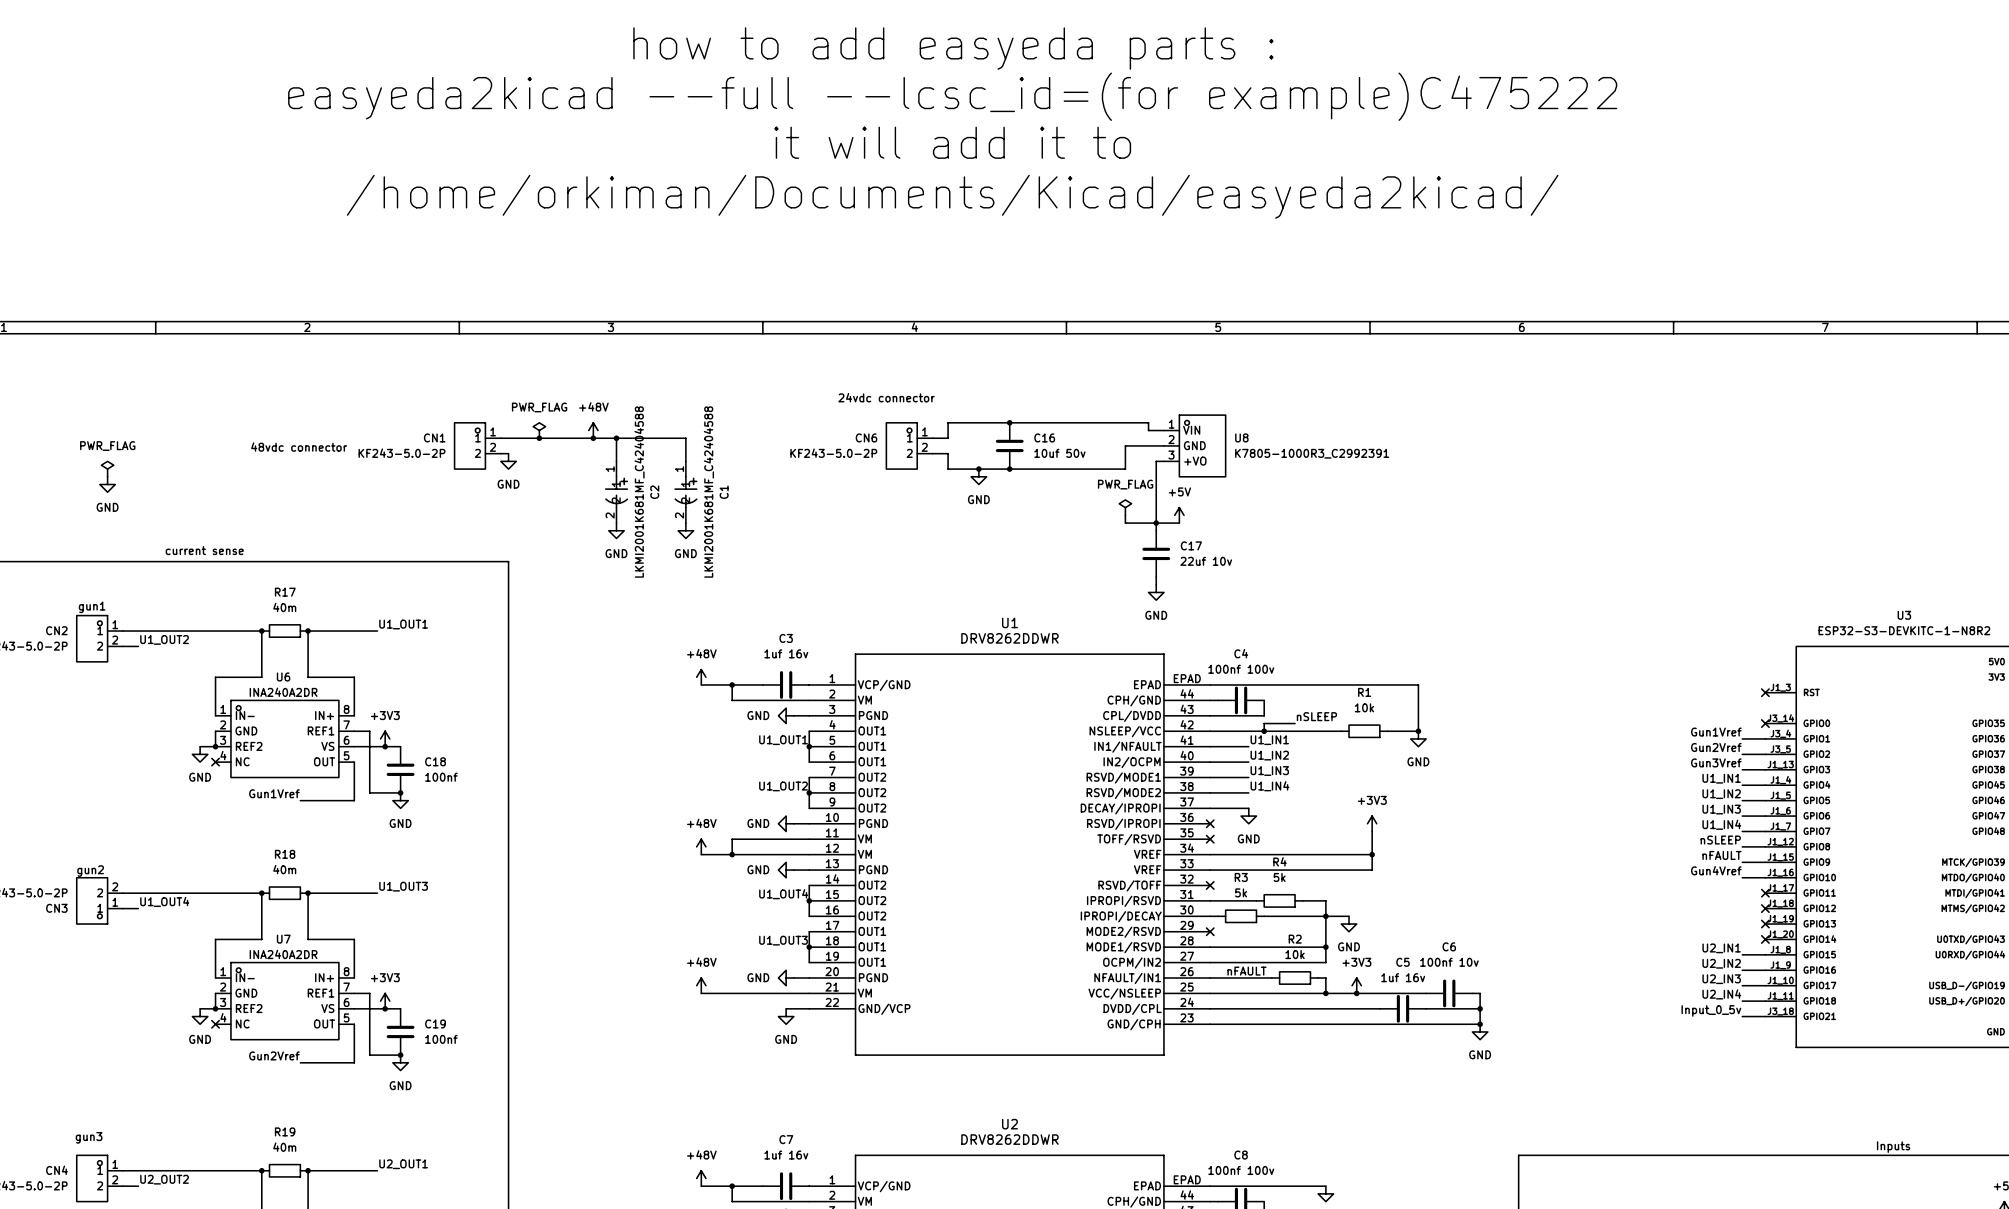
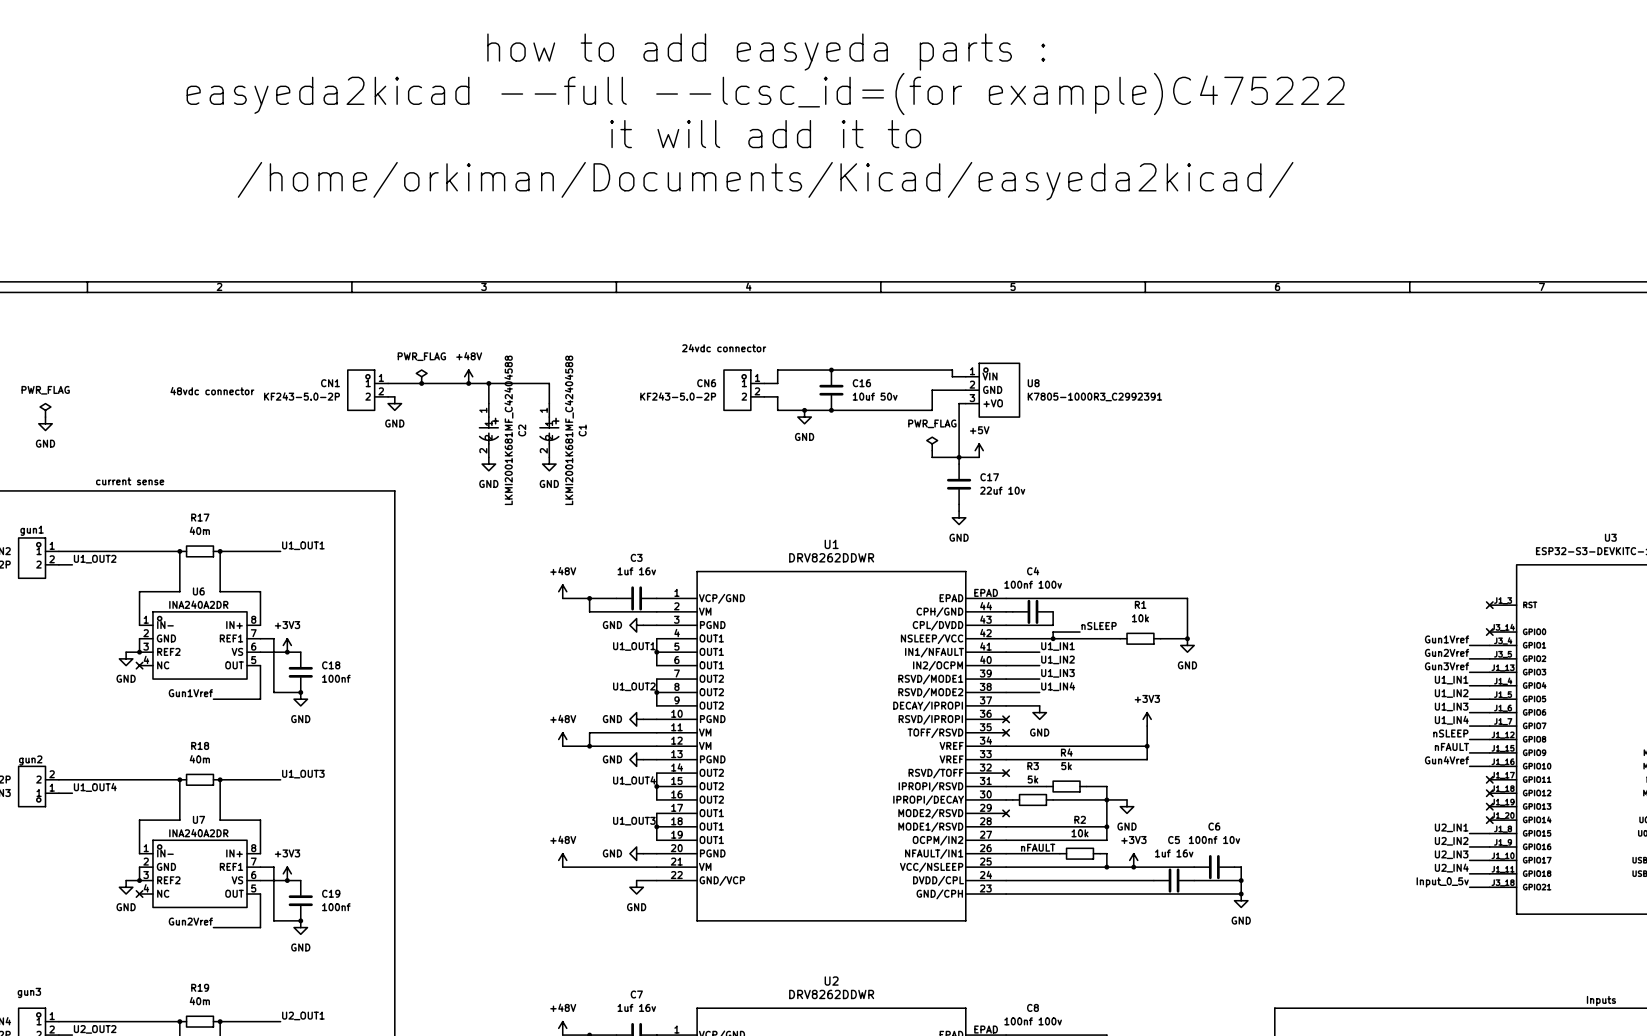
text position: how to add easyeda parts : (953, 48) -> how to add easyeda parts : (766, 52)
text position: easyeda2kicad --full --lcsc_id=(for example)C475222 (952, 96) -> easyeda2kicad --full --lcsc_id=(for example)C475222 (765, 94)
text position: it will add it to (952, 142) -> it will add it to (765, 134)
text position: /home/orkiman/Documents/Kicad/easyeda2kicad/ (952, 196) -> /home/orkiman/Documents/Kicad/easyeda2kicad/ (765, 181)

